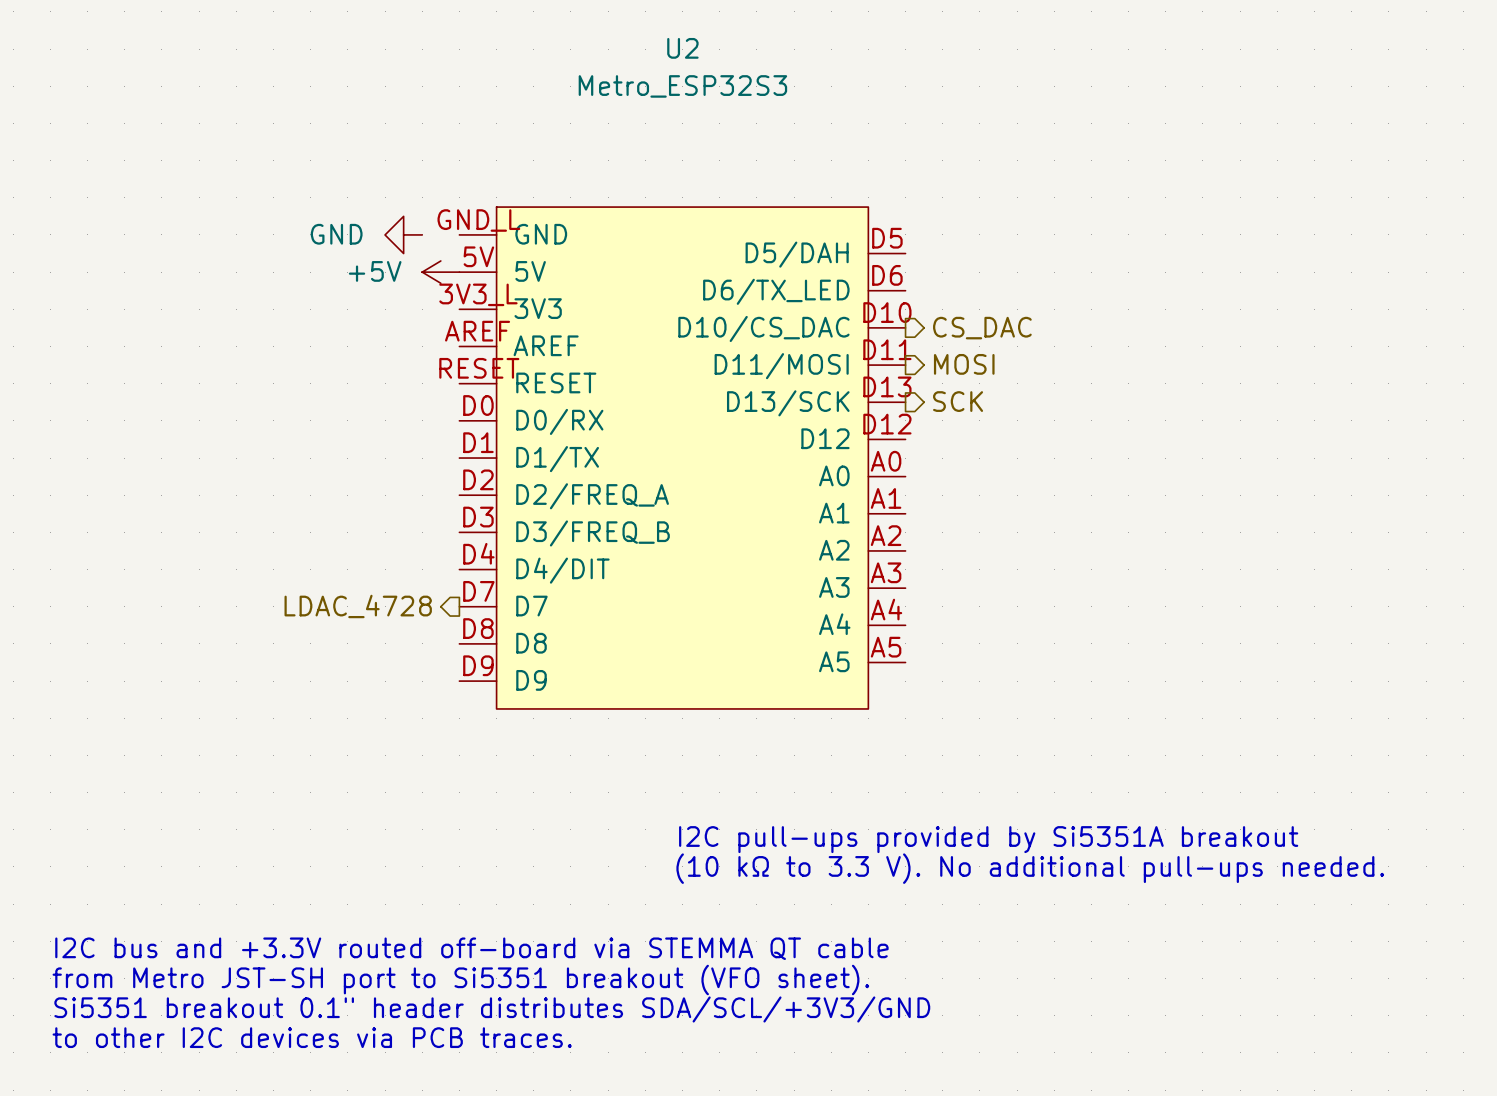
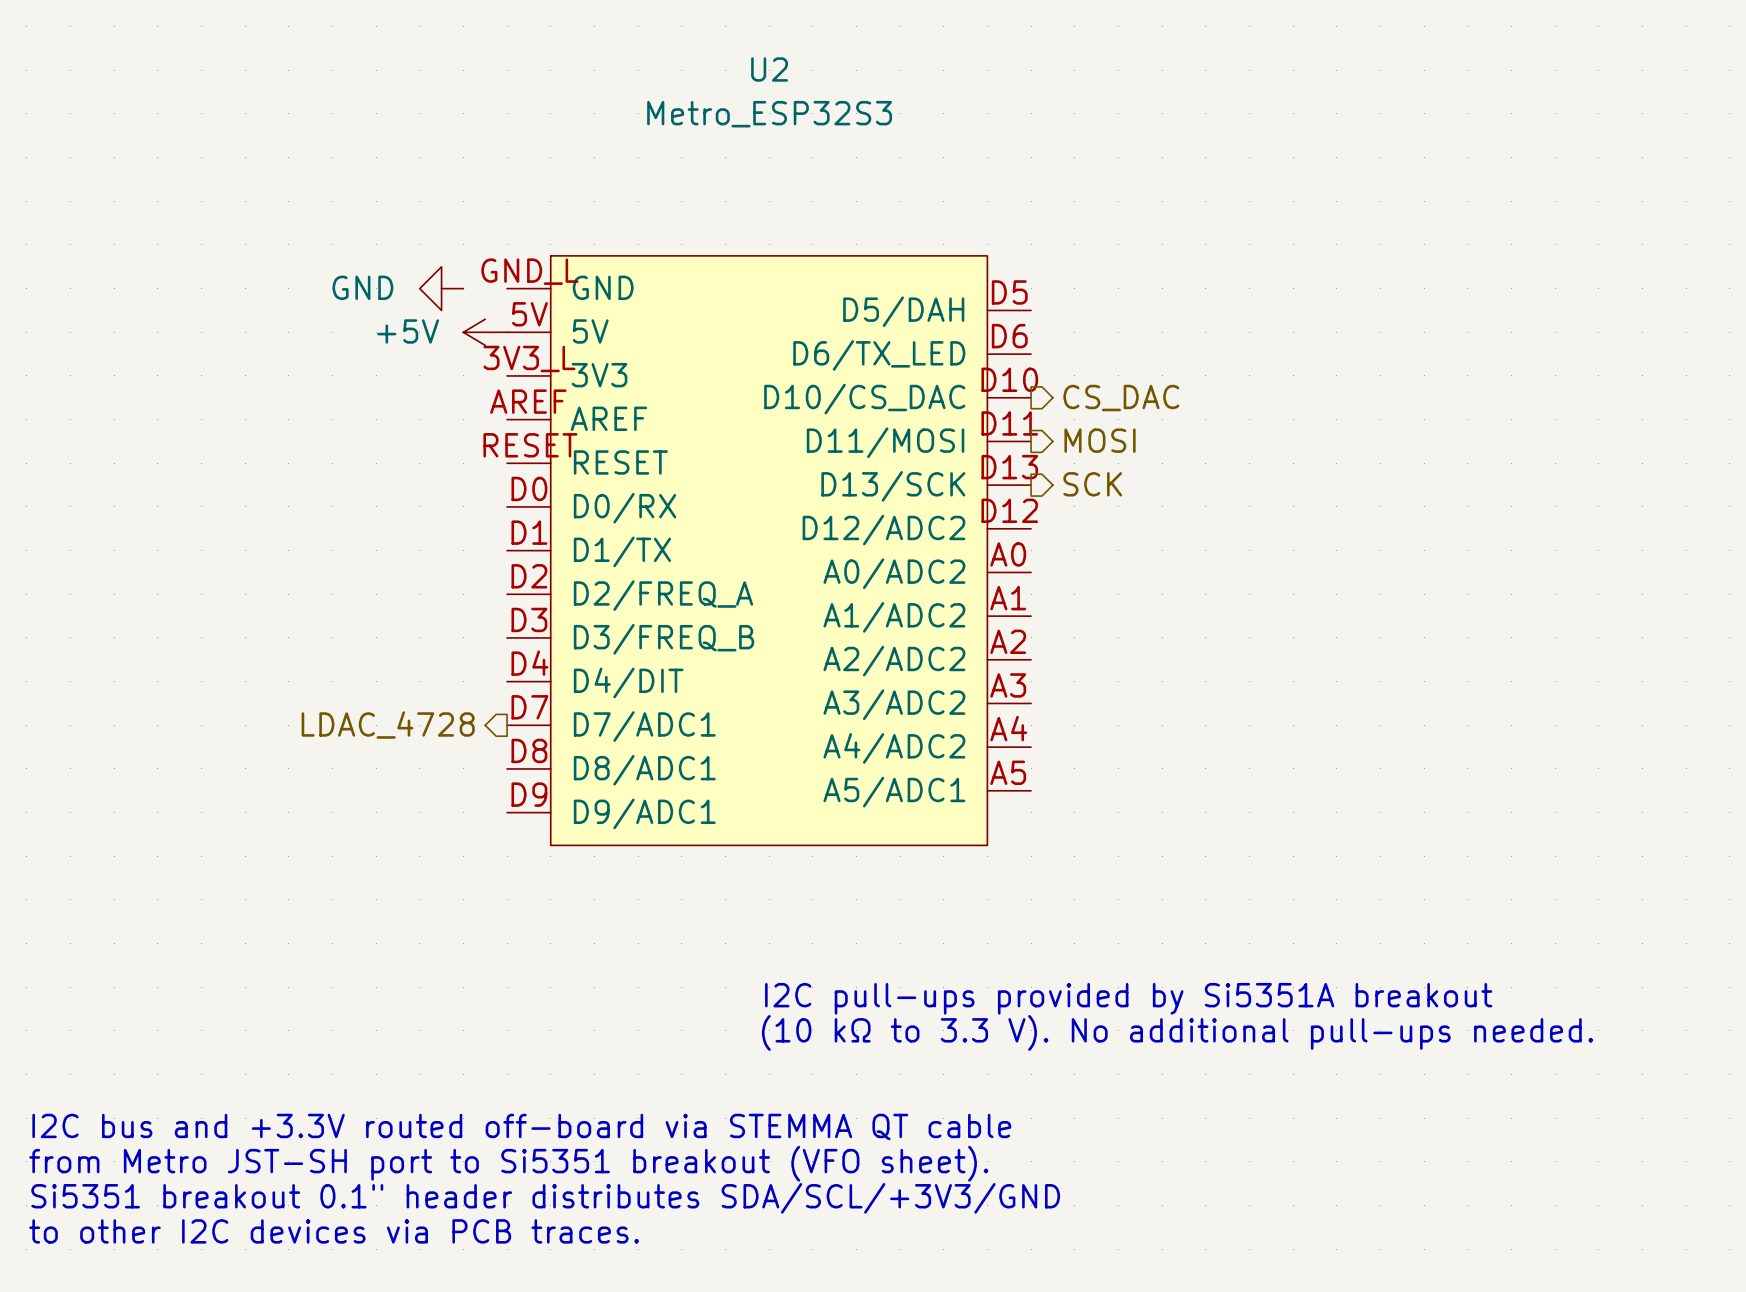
U2 symbol: [459, 207, 906, 709] -> [507, 255, 1032, 846]

